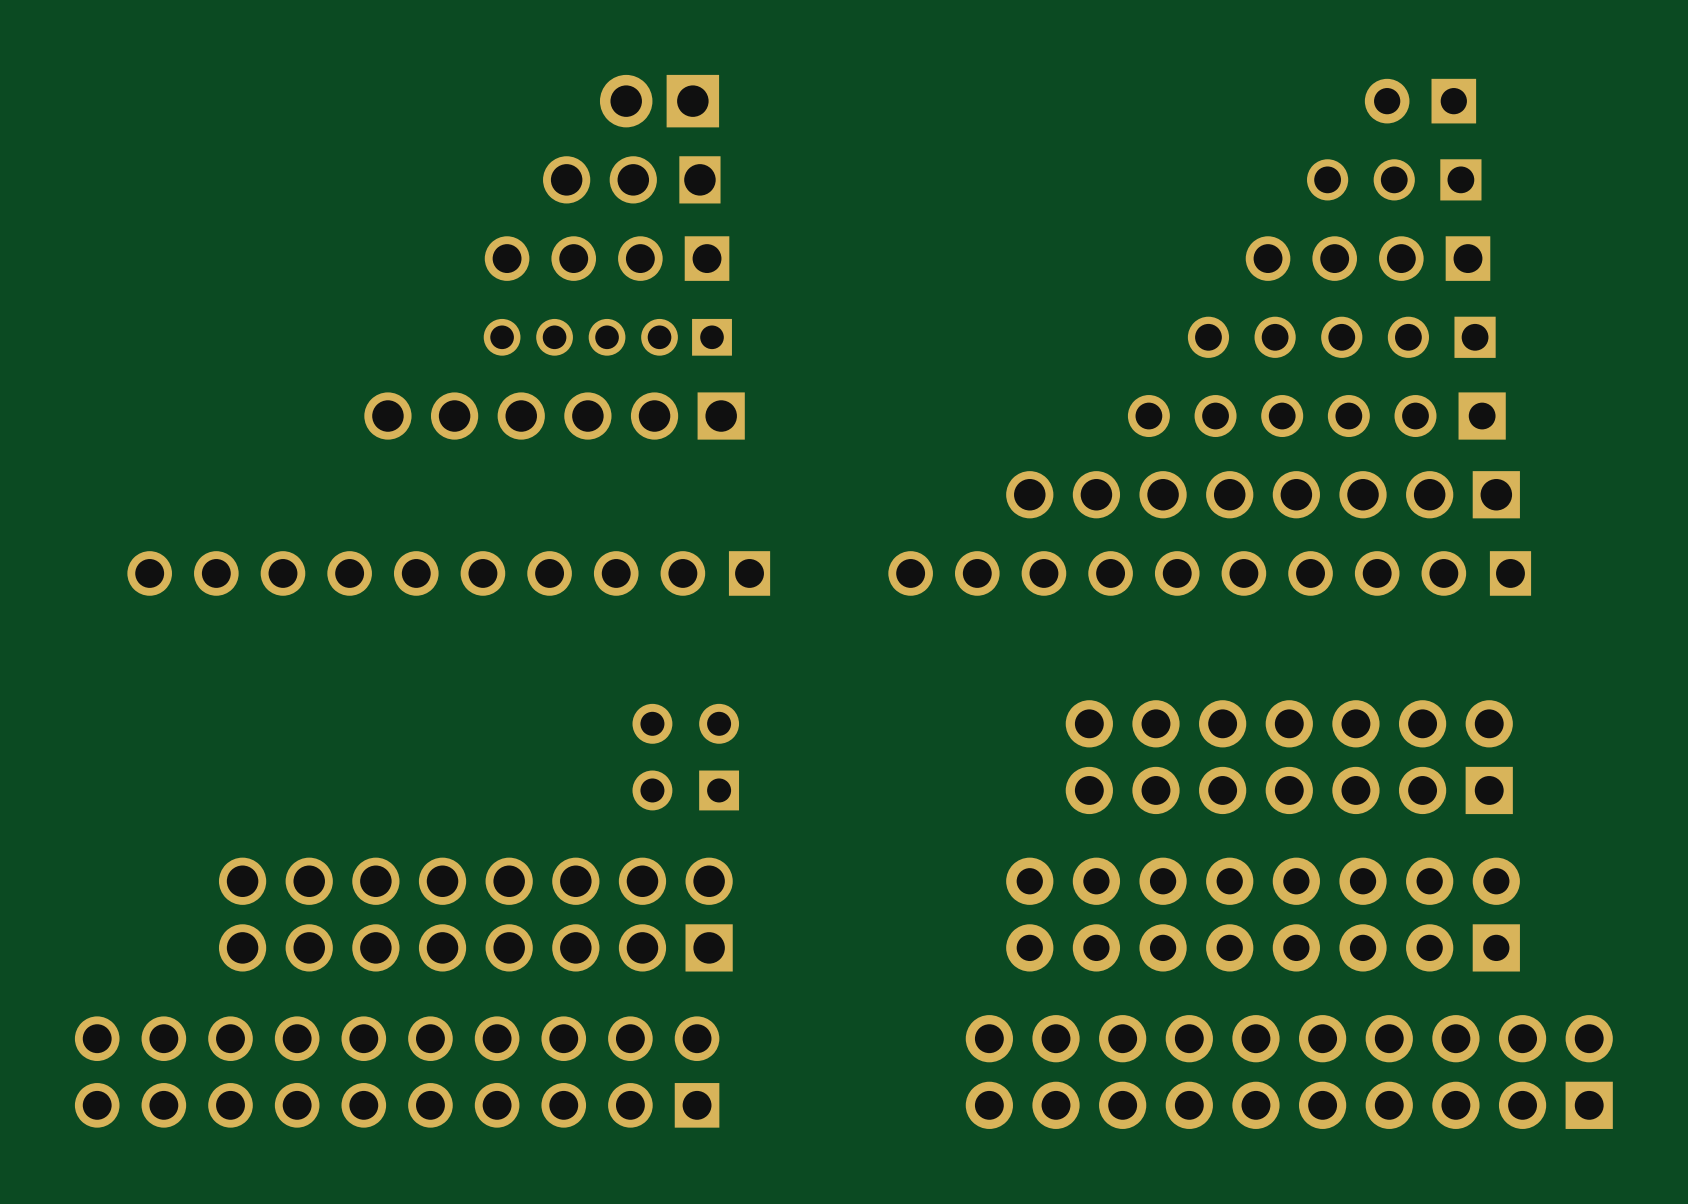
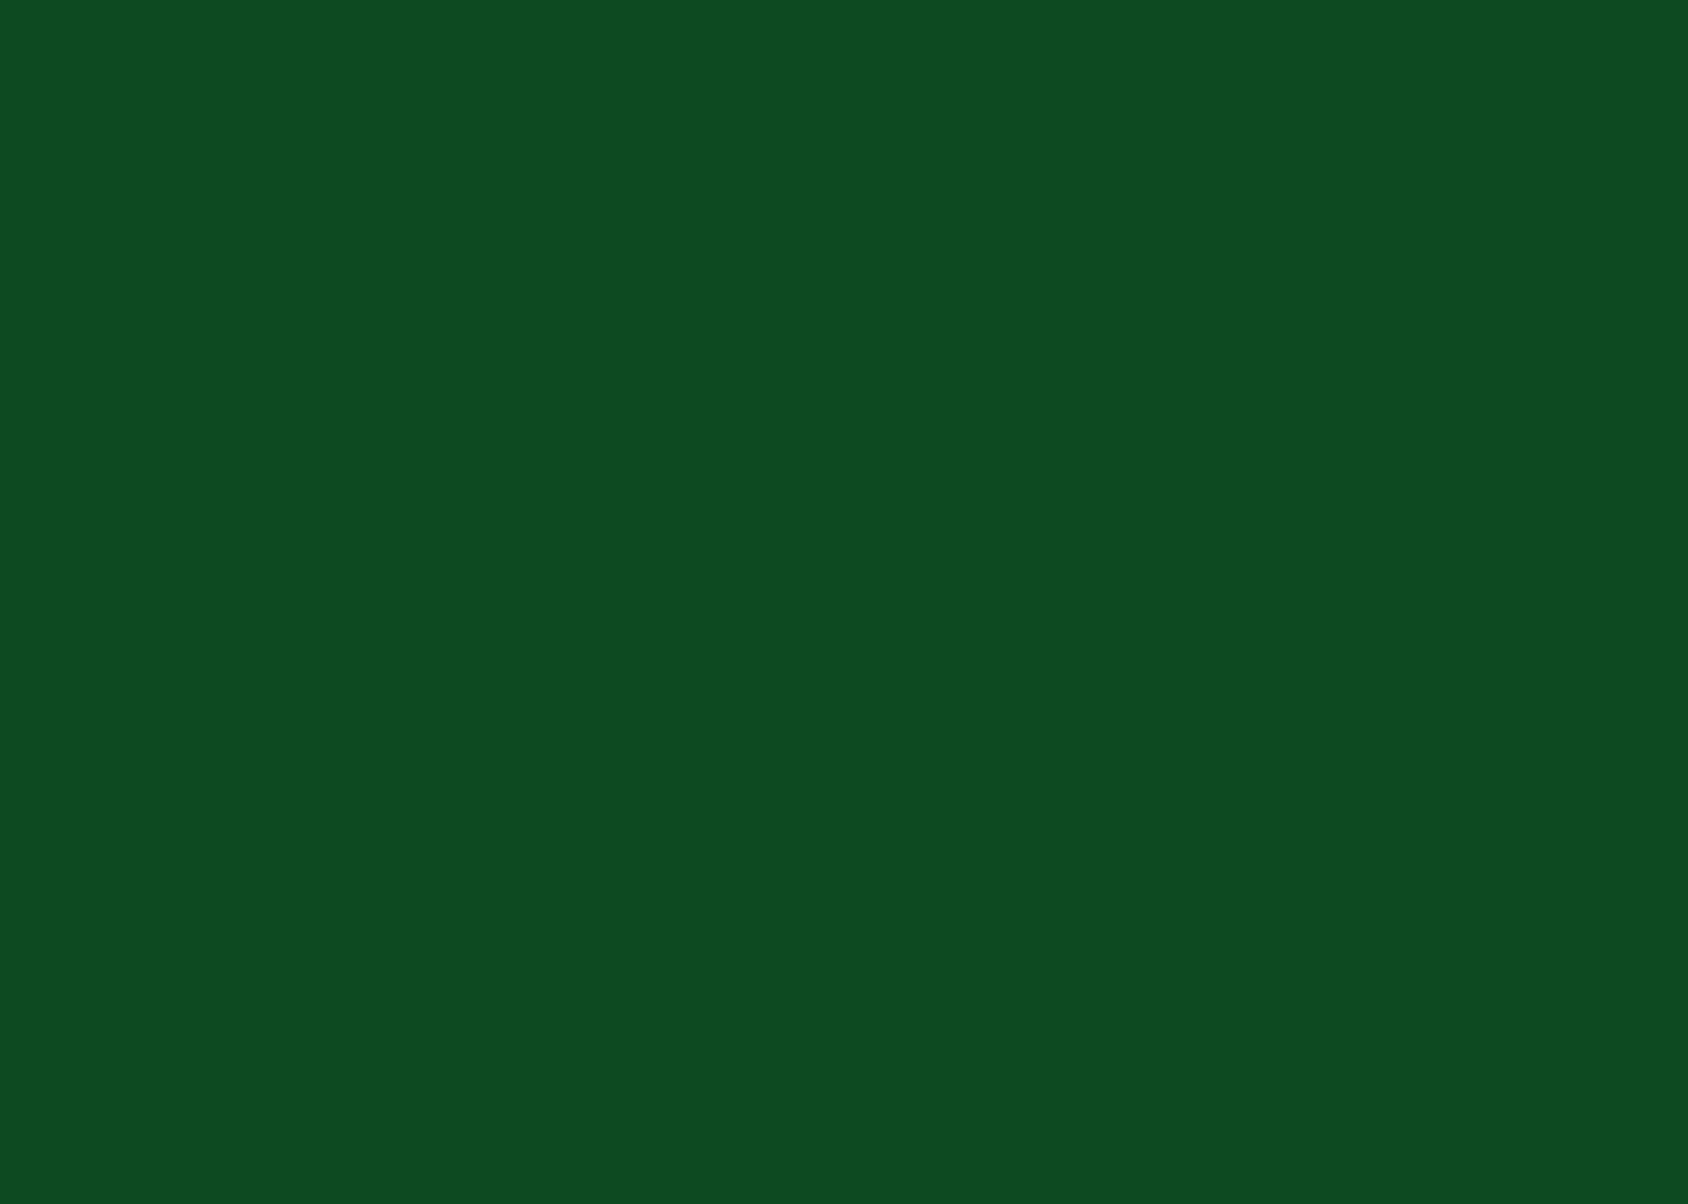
part: (659, 101) -> none
part: (1420, 101) -> none
part: (631, 179) -> none
part: (1394, 179) -> none
part: (607, 258) -> none
part: (1368, 258) -> none
part: (607, 337) -> none
part: (1341, 337) -> none
part: (554, 416) -> none
part: (1316, 416) -> none
part: (1263, 494) -> none
part: (448, 573) -> none
part: (1209, 573) -> none
part: (685, 757) -> none
part: (1289, 757) -> none
part: (475, 914) -> none
part: (1263, 914) -> none
part: (397, 1072) -> none
part: (1289, 1072) -> none

